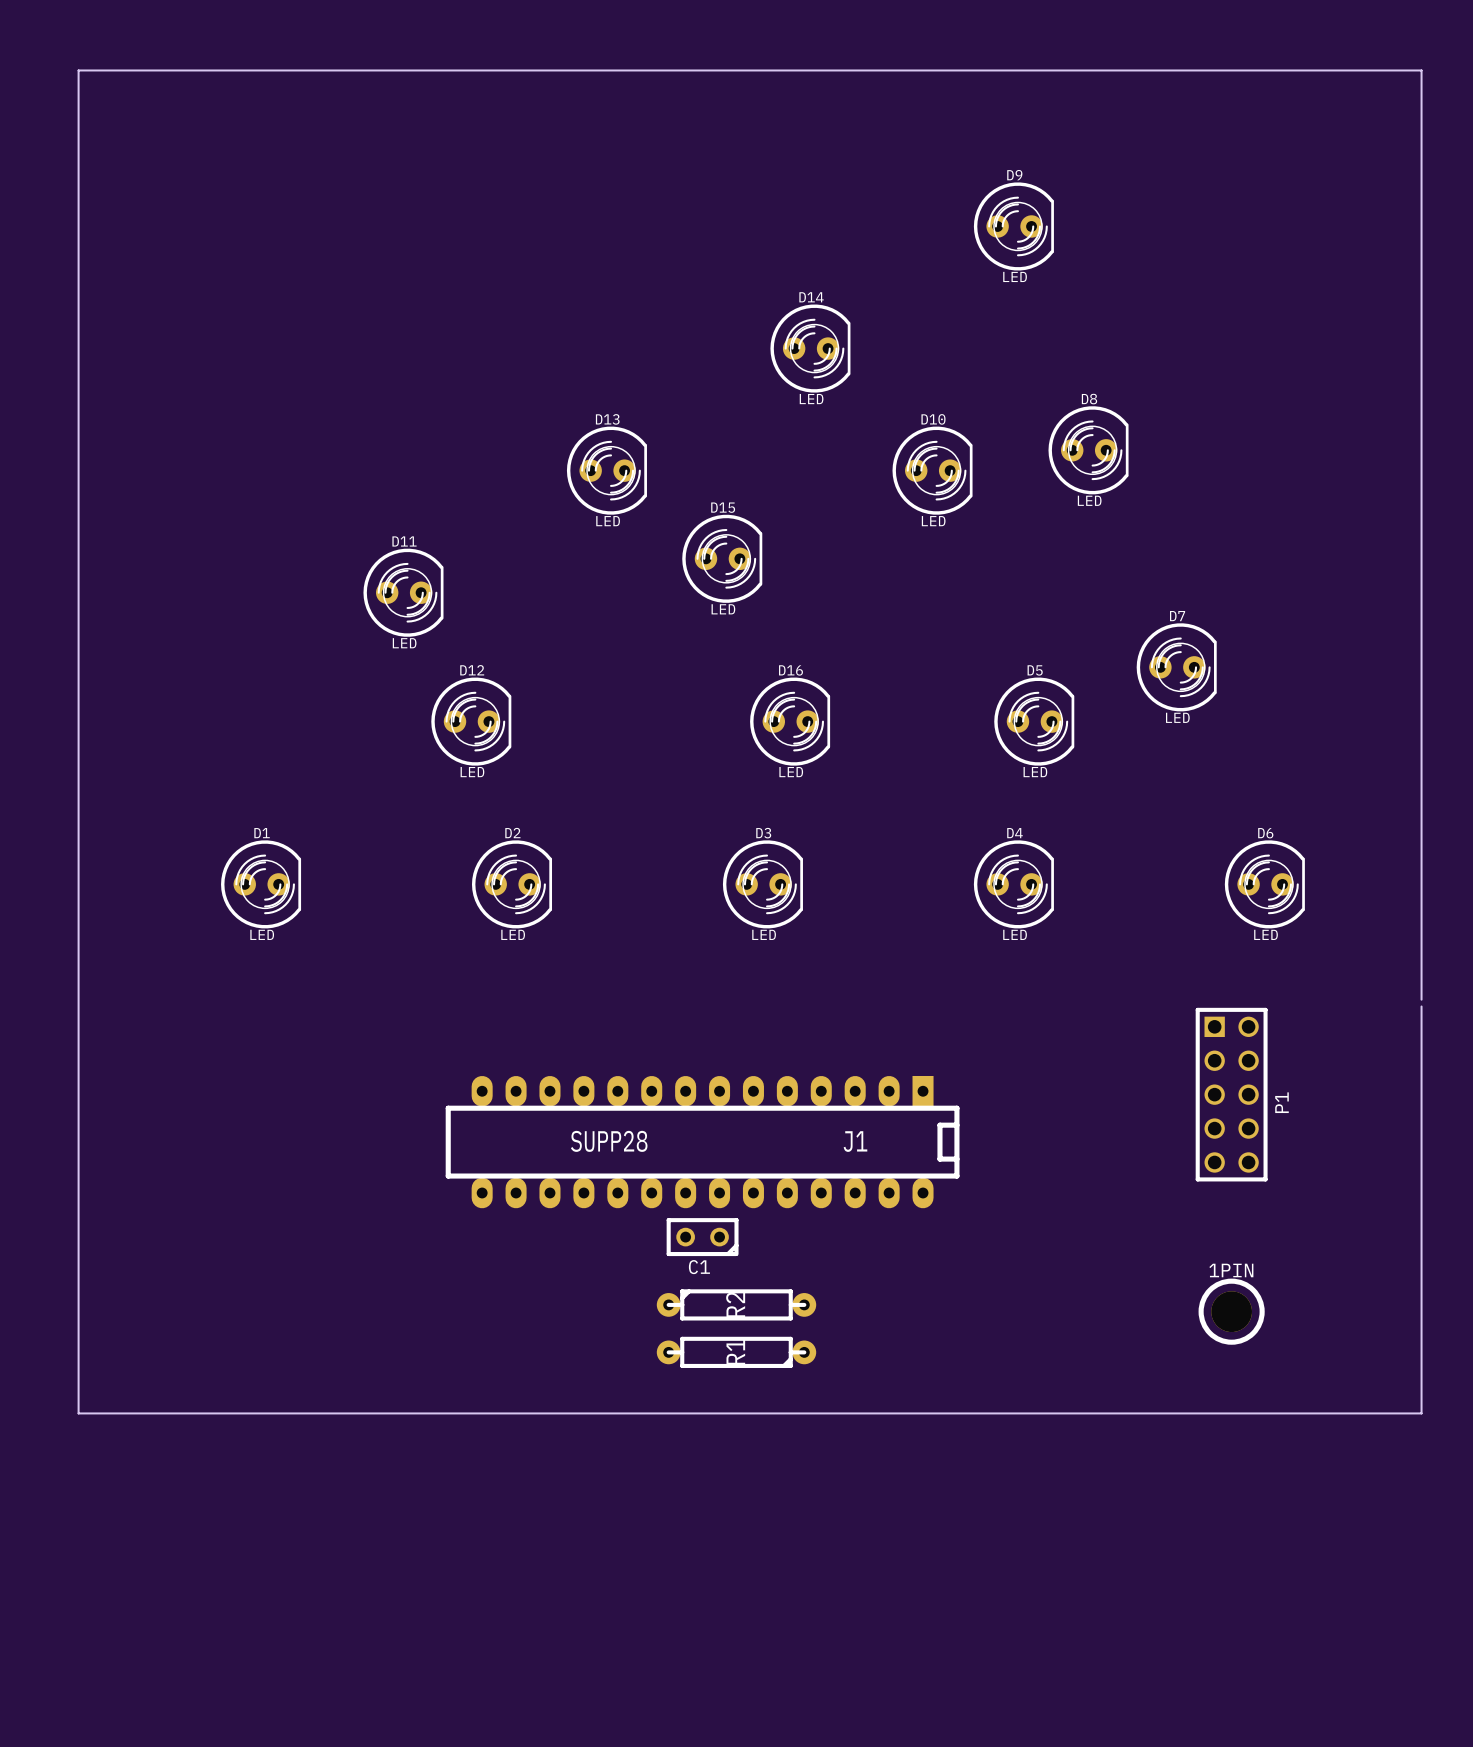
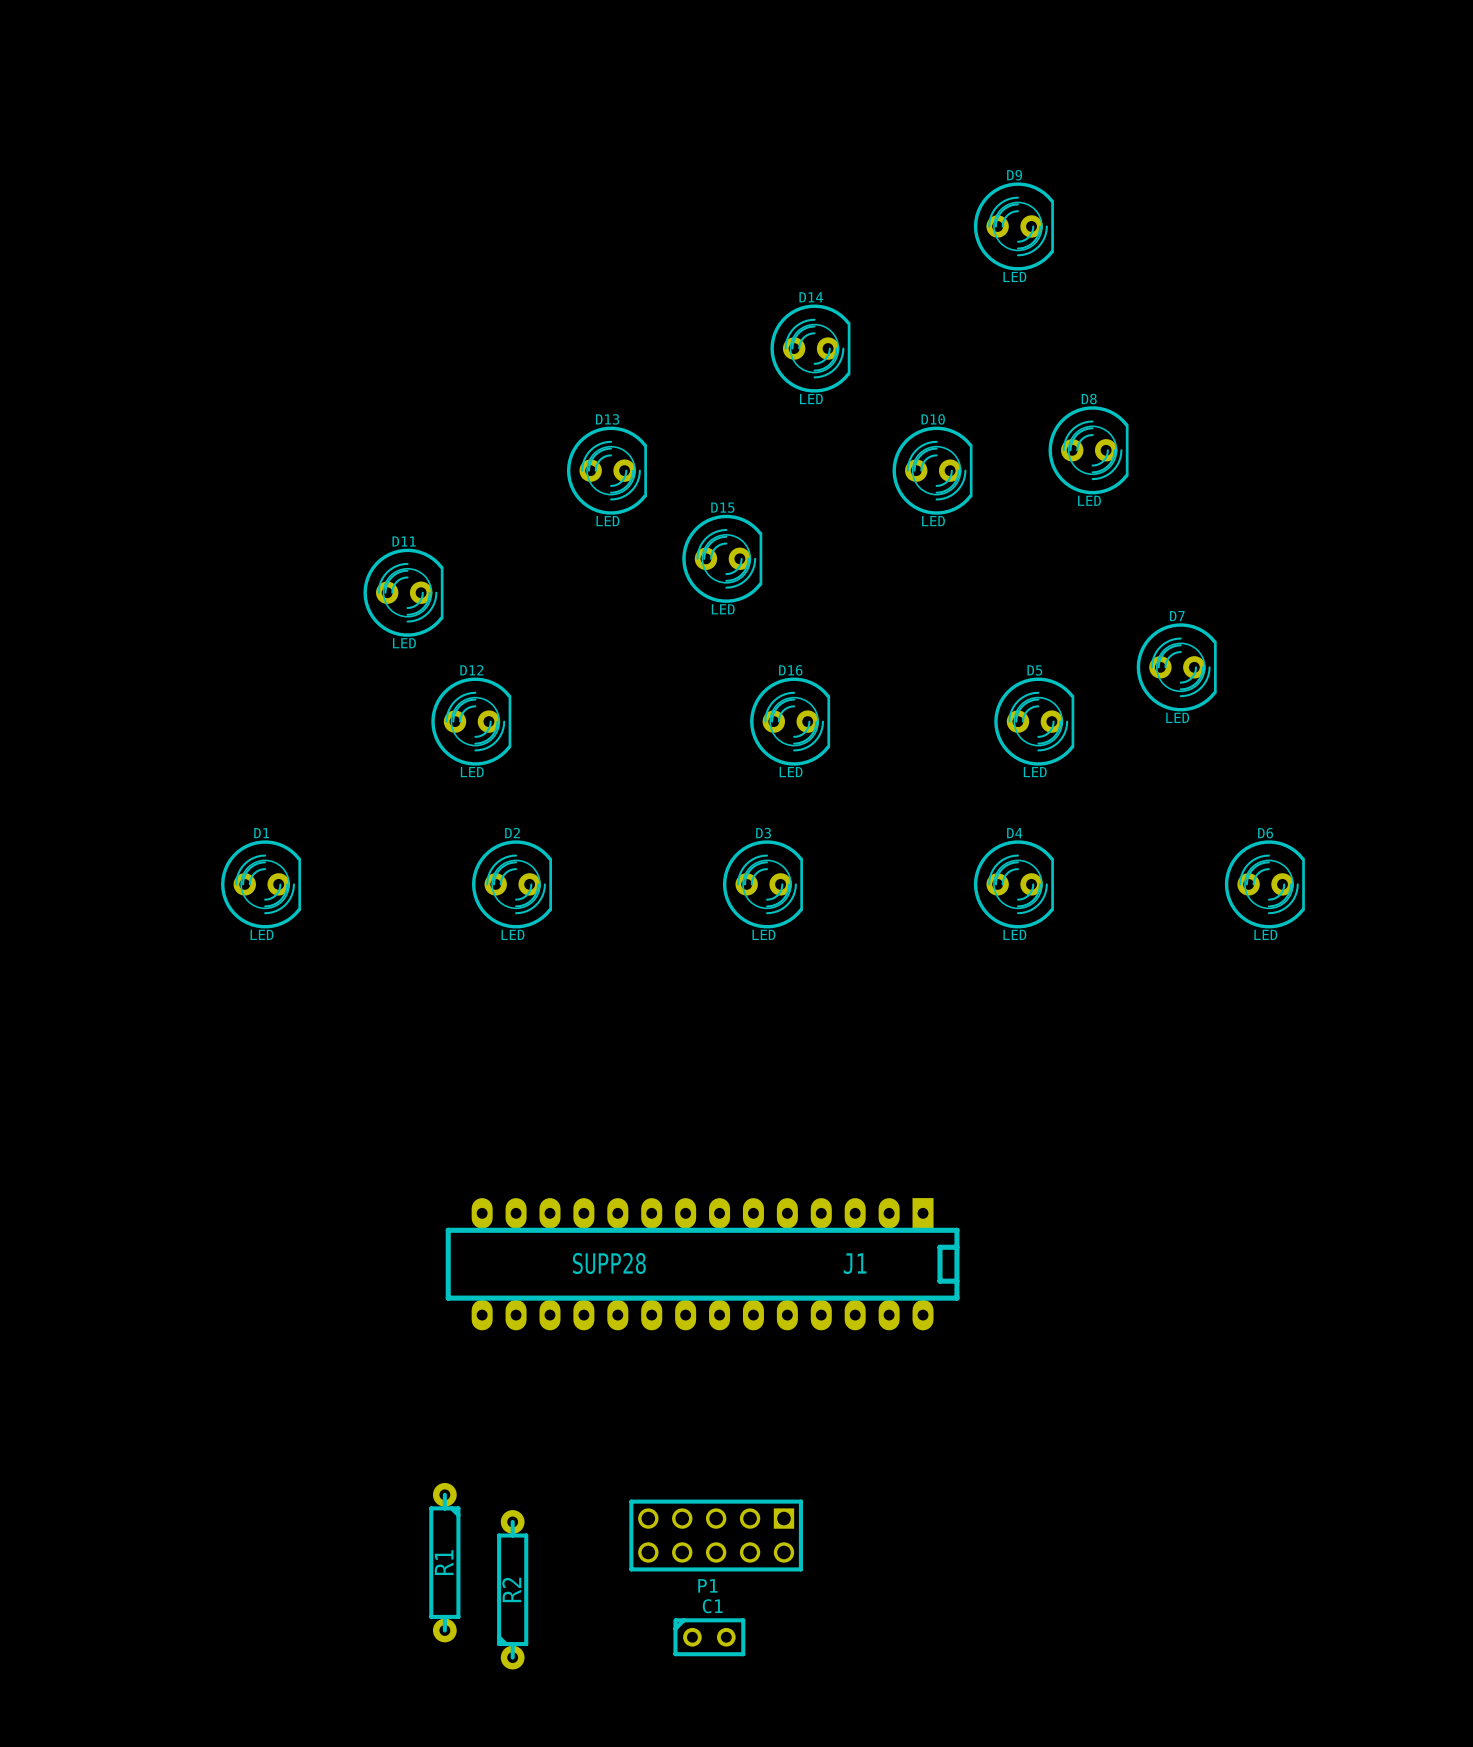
board edge: (1421, 999) (1421, 70) (78, 70) (78, 1413) (1421, 1413) (1421, 1006) -> none
P1 rotation: 0° (1231, 1094) -> 90° clockwise (716, 1535)
P1 position: (1231, 1094) -> (716, 1535)
J1 position: (702, 1142) -> (702, 1264)
C1 rotation: 0° (702, 1237) -> 180° (709, 1637)
C1 position: (702, 1237) -> (709, 1637)
R2 rotation: 0° (736, 1304) -> 90° counterclockwise (512, 1589)
R2 position: (736, 1304) -> (512, 1589)
1PIN: (1231, 1311) -> none
R1 rotation: 0° (736, 1352) -> 90° counterclockwise (444, 1562)
R1 position: (736, 1352) -> (444, 1562)

